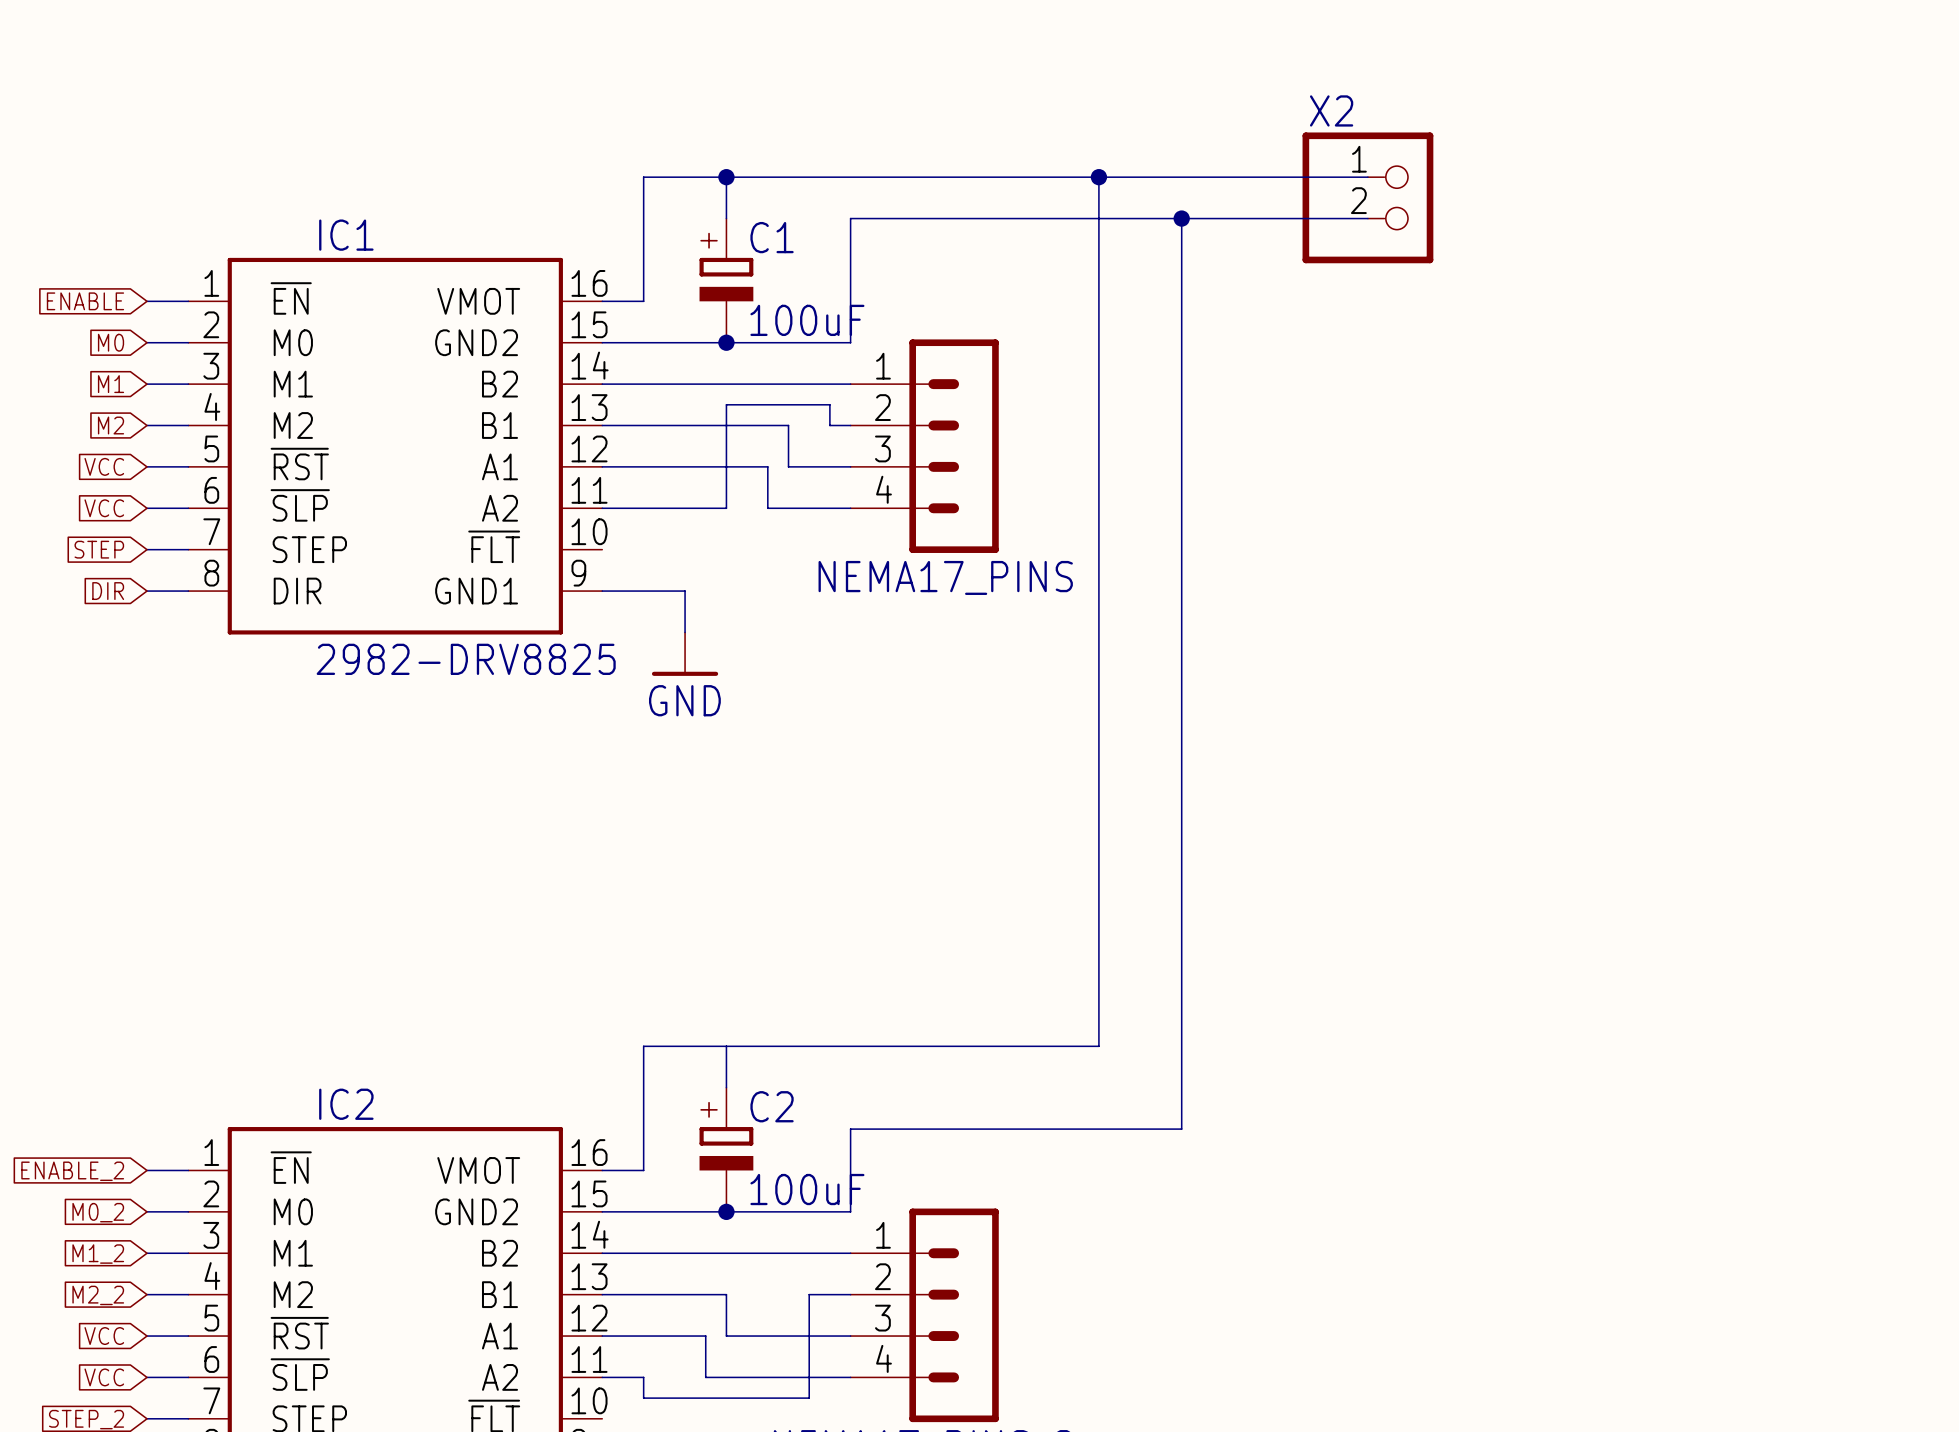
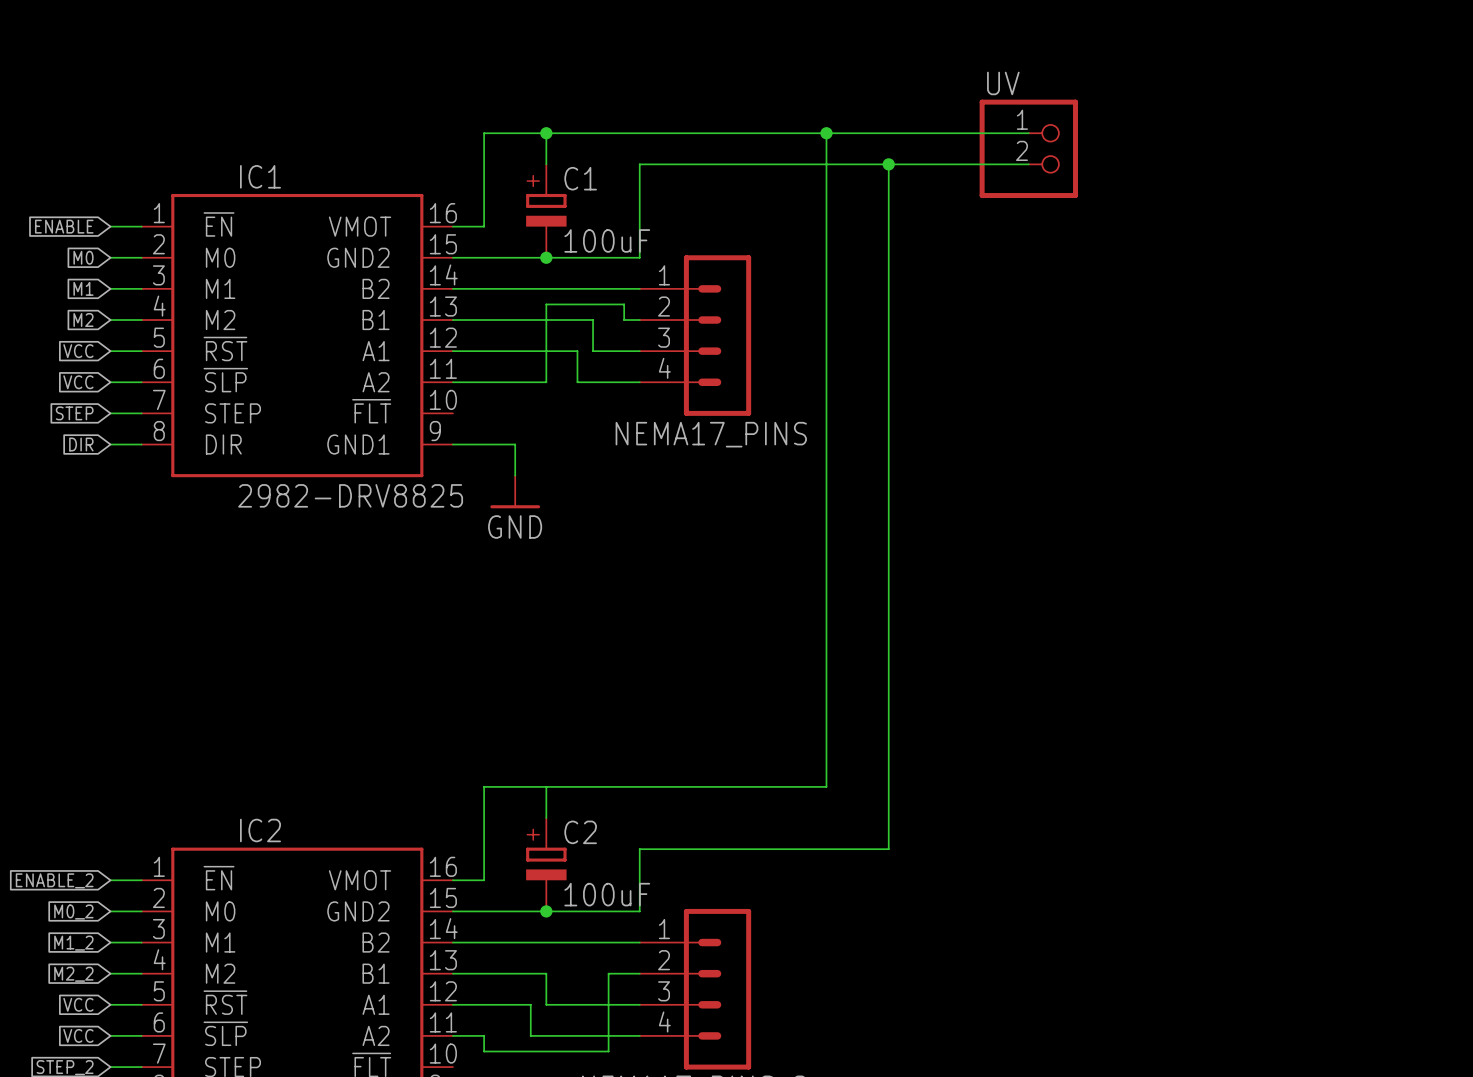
X2 name: X2 (1331, 110) -> UV (1003, 83)

